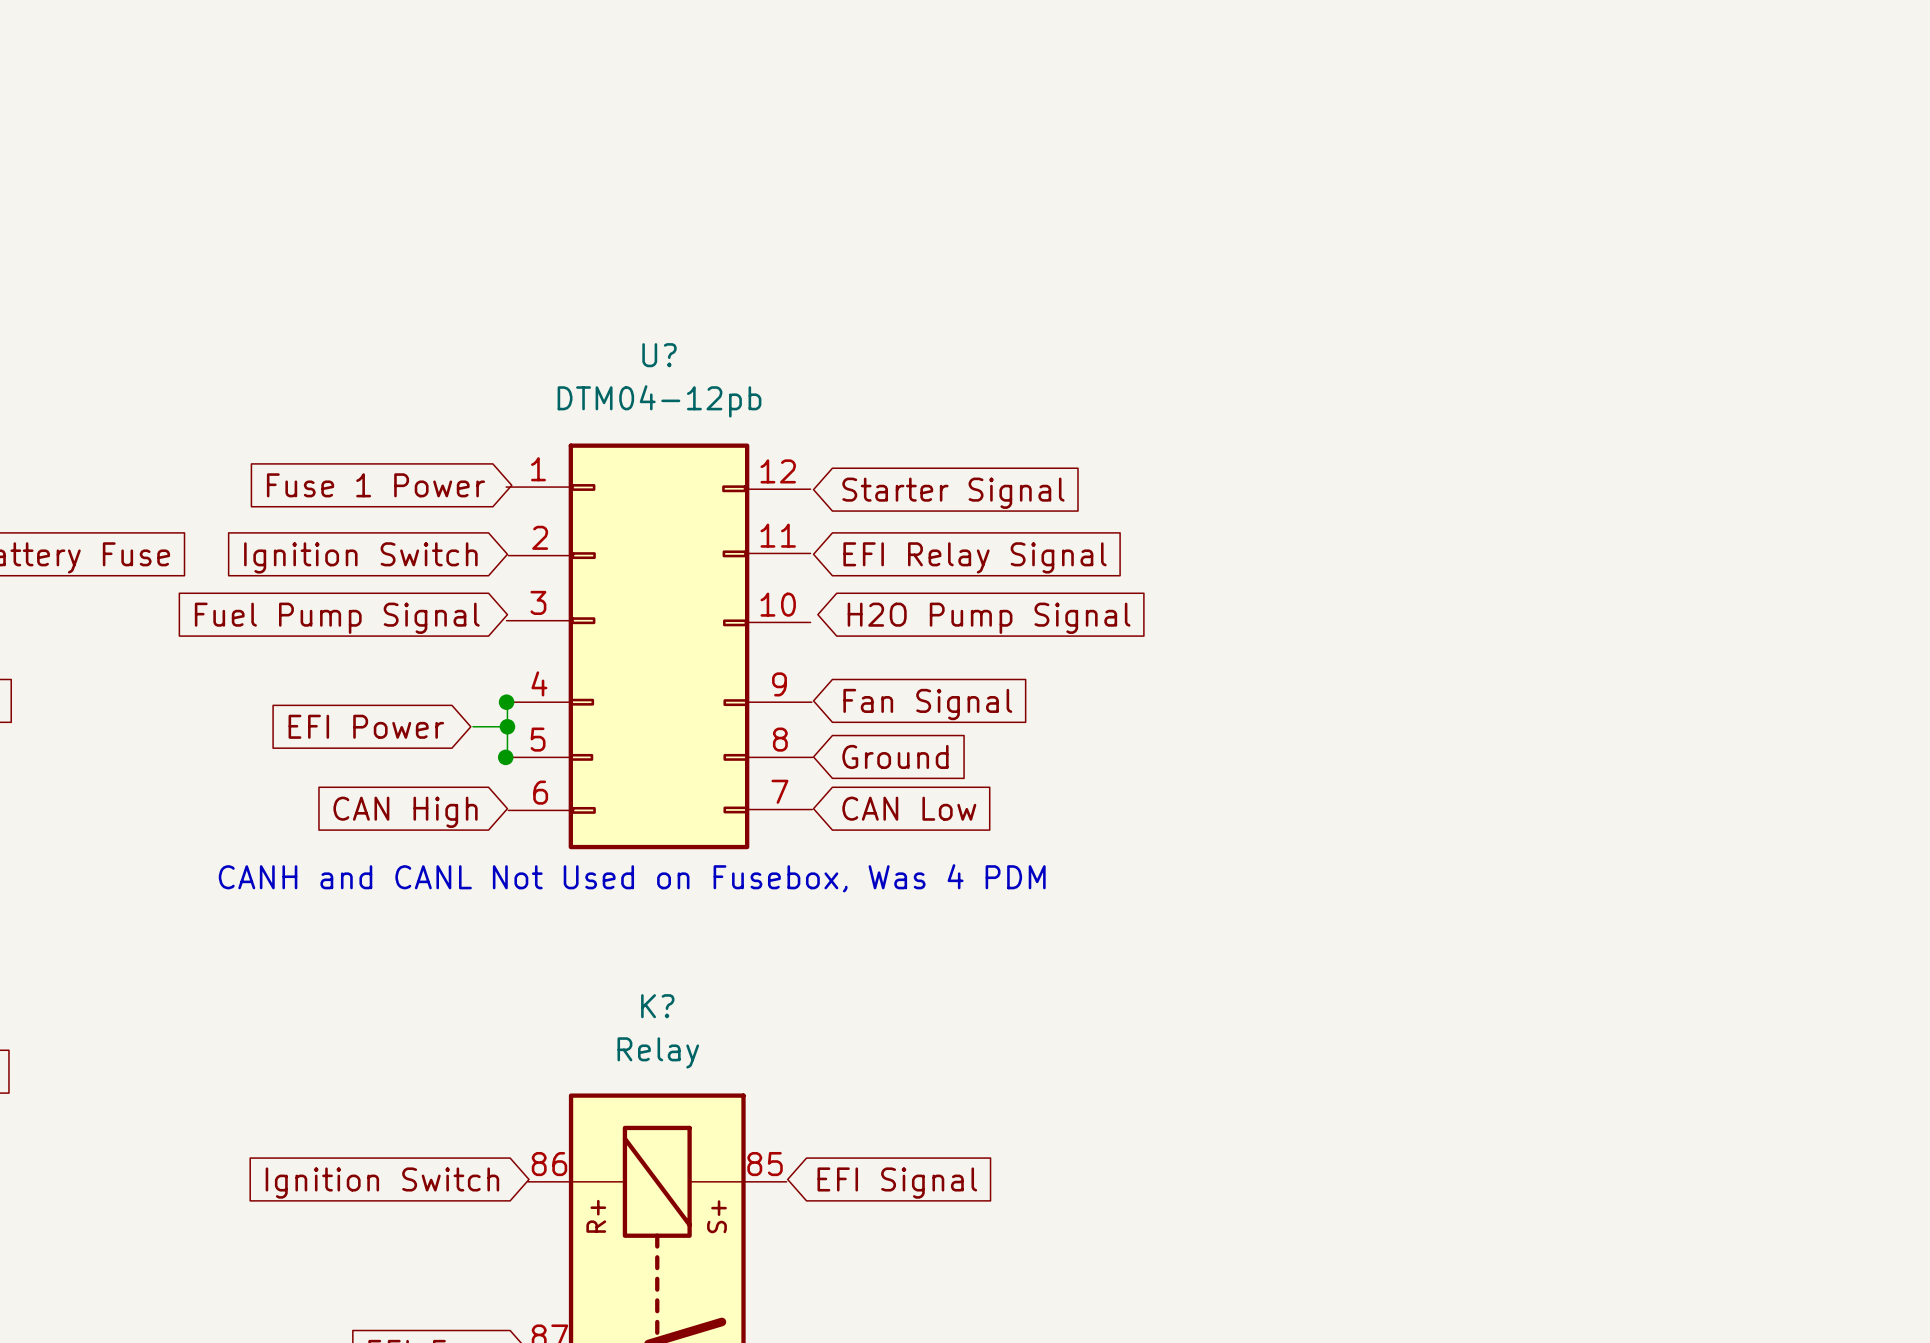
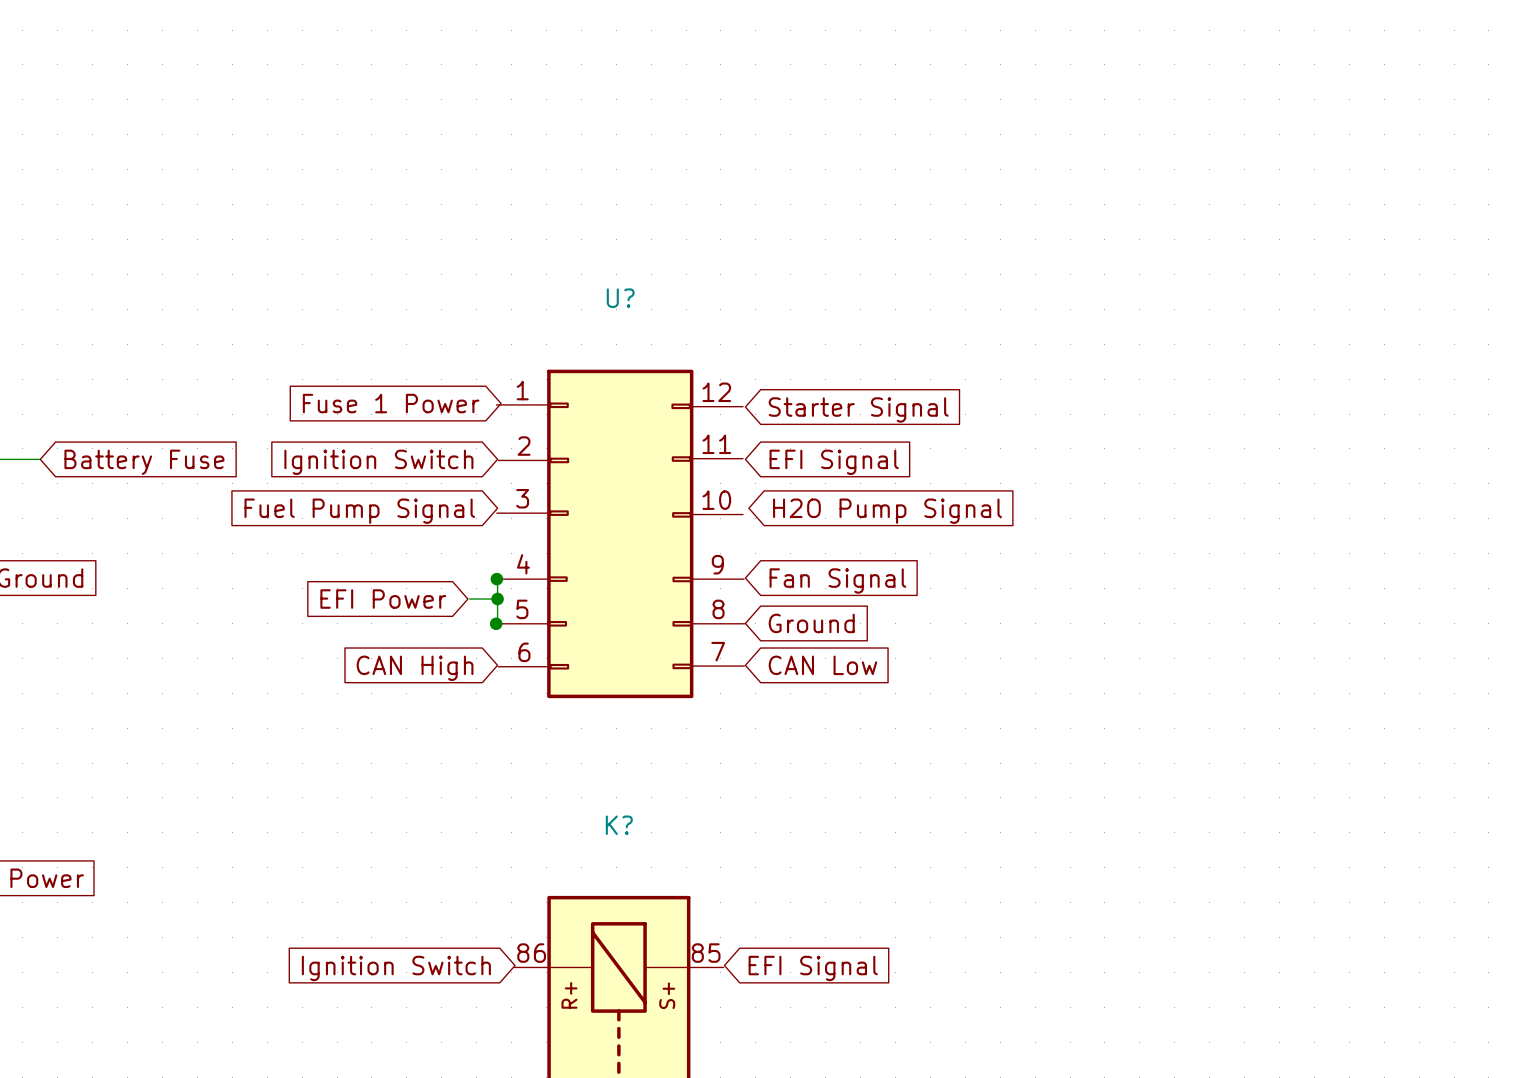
U? value: DTM04-12pb (659, 401) -> none
global label: EFI Relay Signal (975, 557) -> EFI Signal (834, 462)
text: CANH and CANL Not Used on Fusebox, Was 4 PDM (632, 878) -> none
K? value: Relay (658, 1052) -> none

